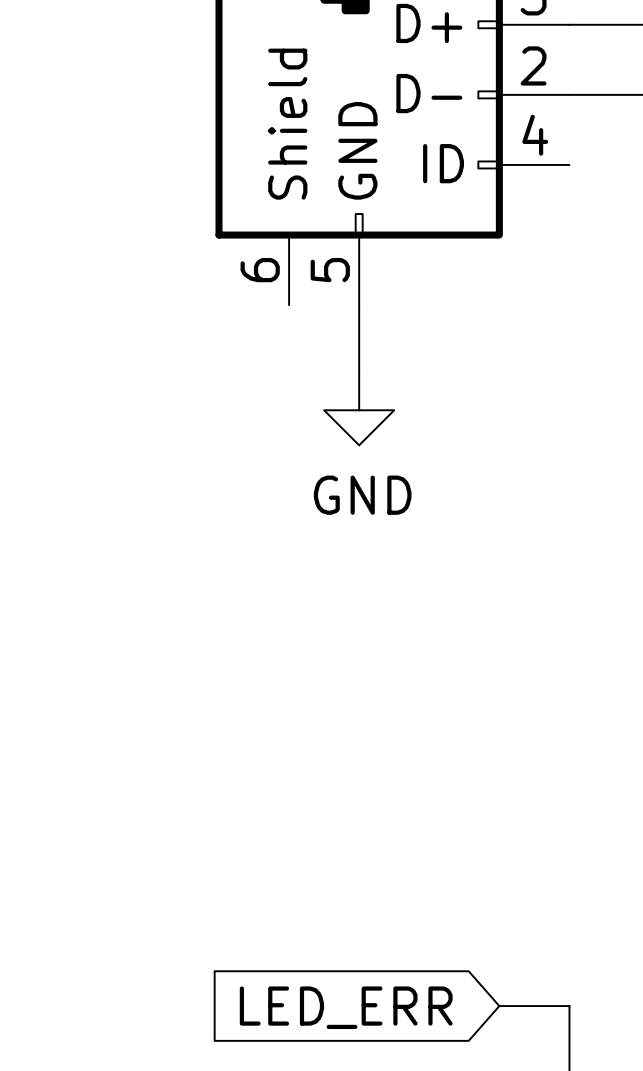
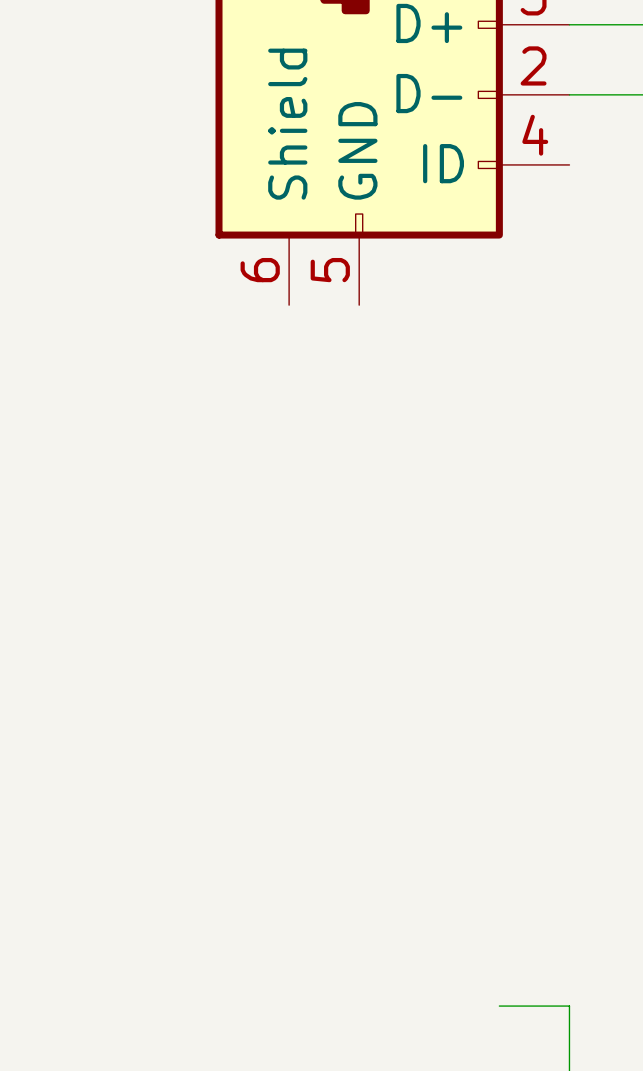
wire: (359, 305) (359, 375) -> none
power symbol: GND (359, 410) -> none
global label: LED_ERR (346, 1007) -> none

